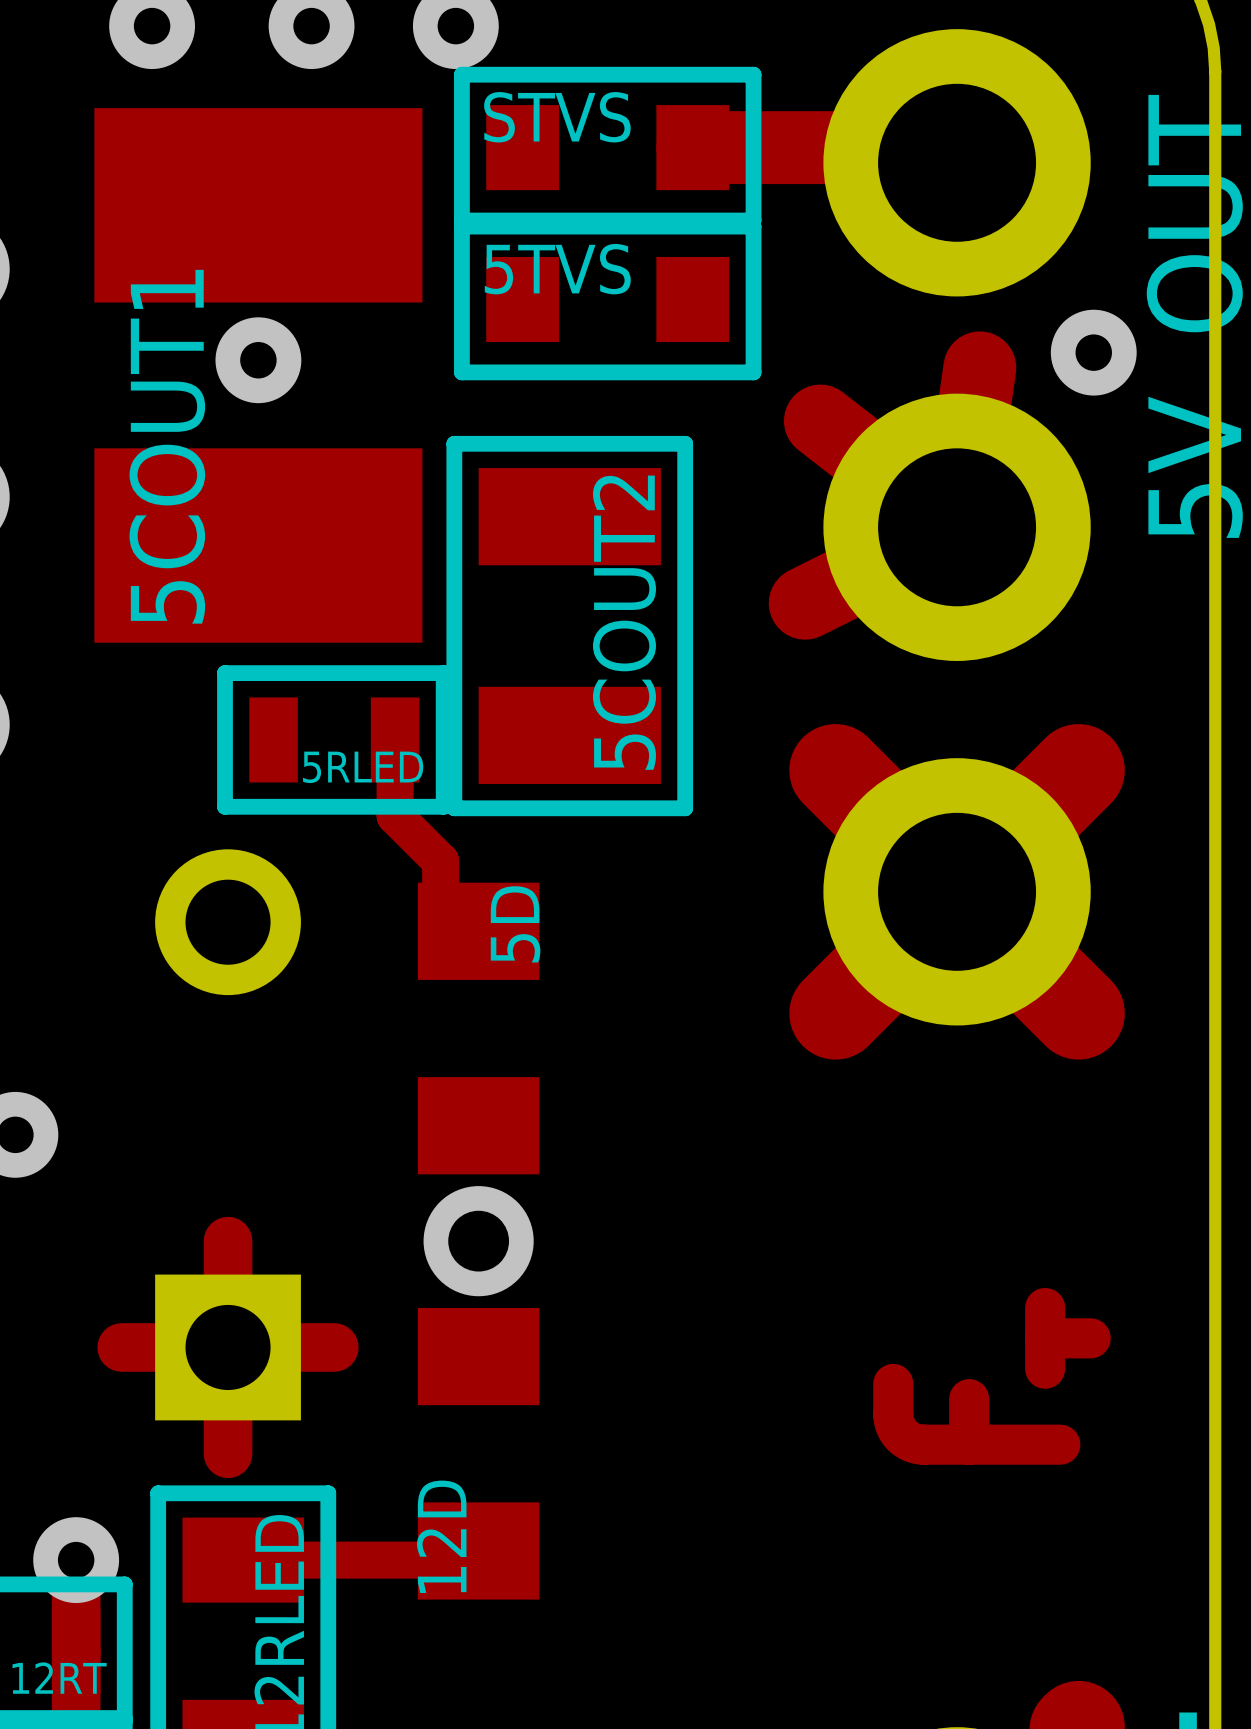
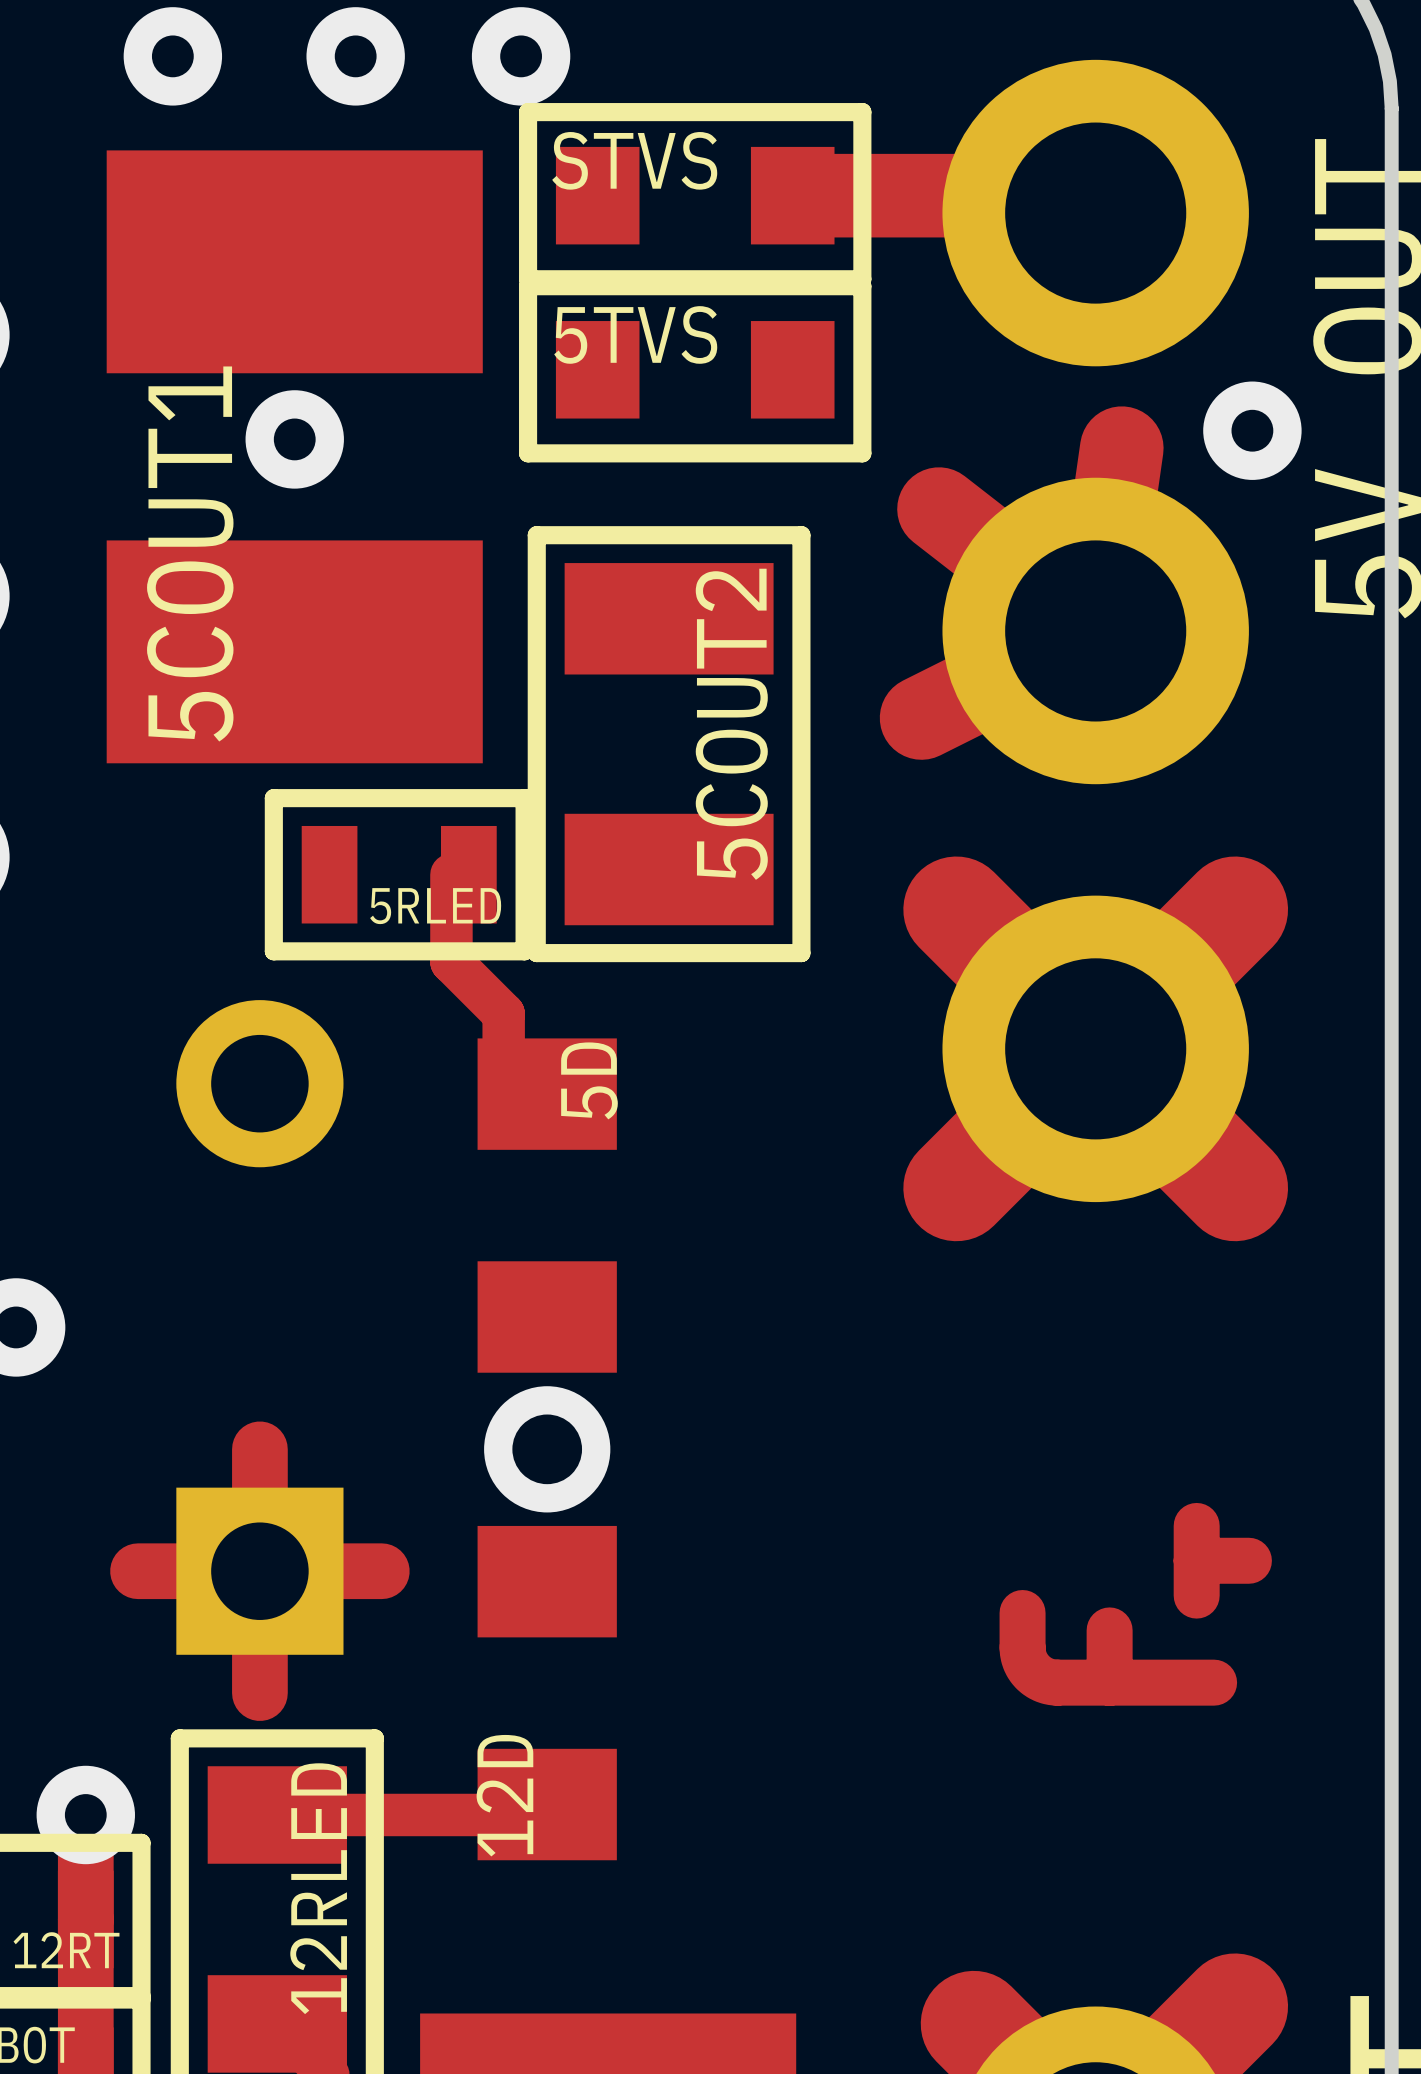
5COUT2 position: (569, 626) -> (669, 744)
5RLED position: (334, 739) -> (399, 874)

